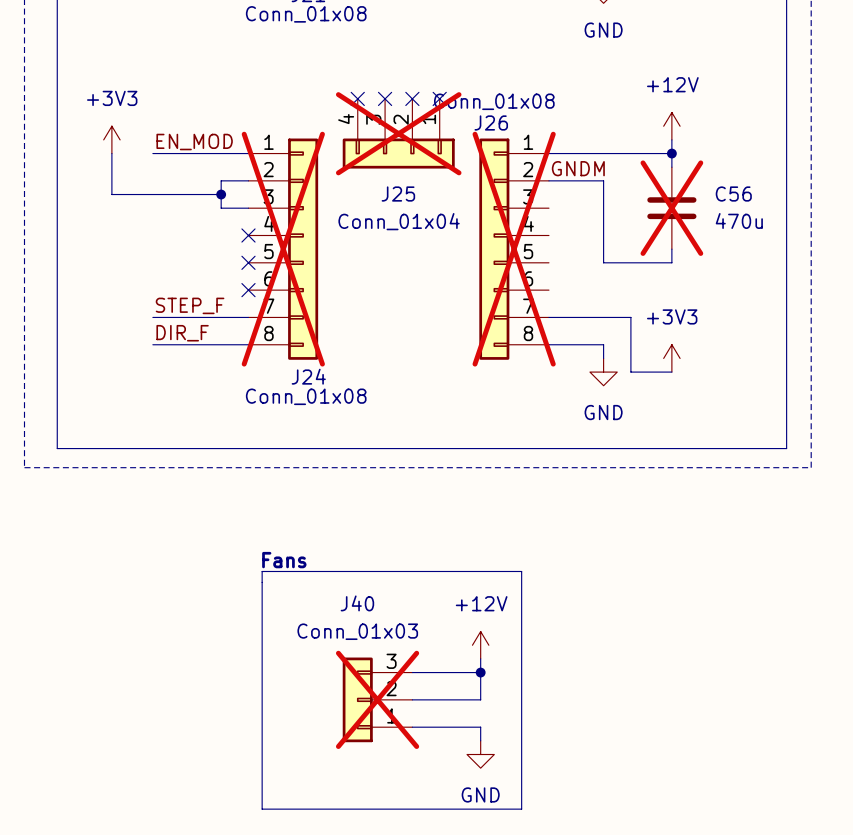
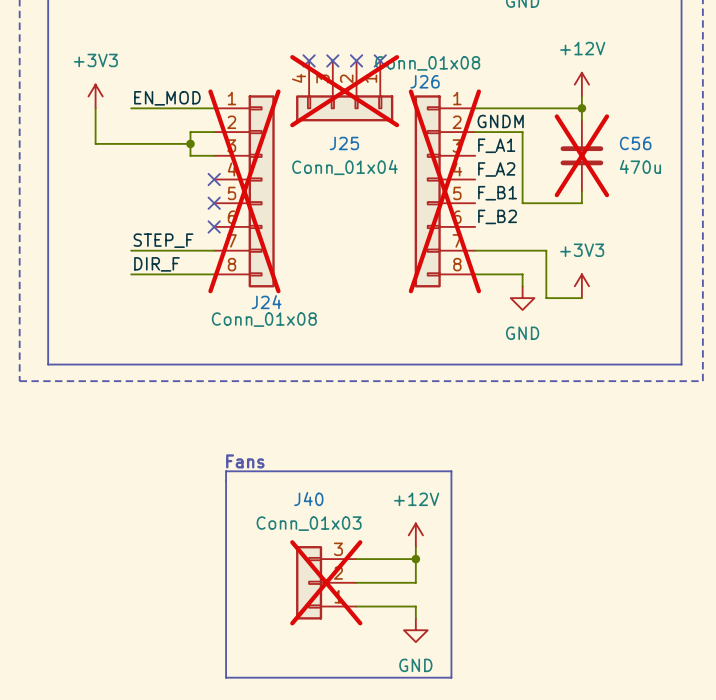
label: none -> F_A1 (496, 145)
label: none -> F_A2 (496, 169)
label: none -> F_B1 (497, 193)
label: none -> F_B2 (497, 216)

